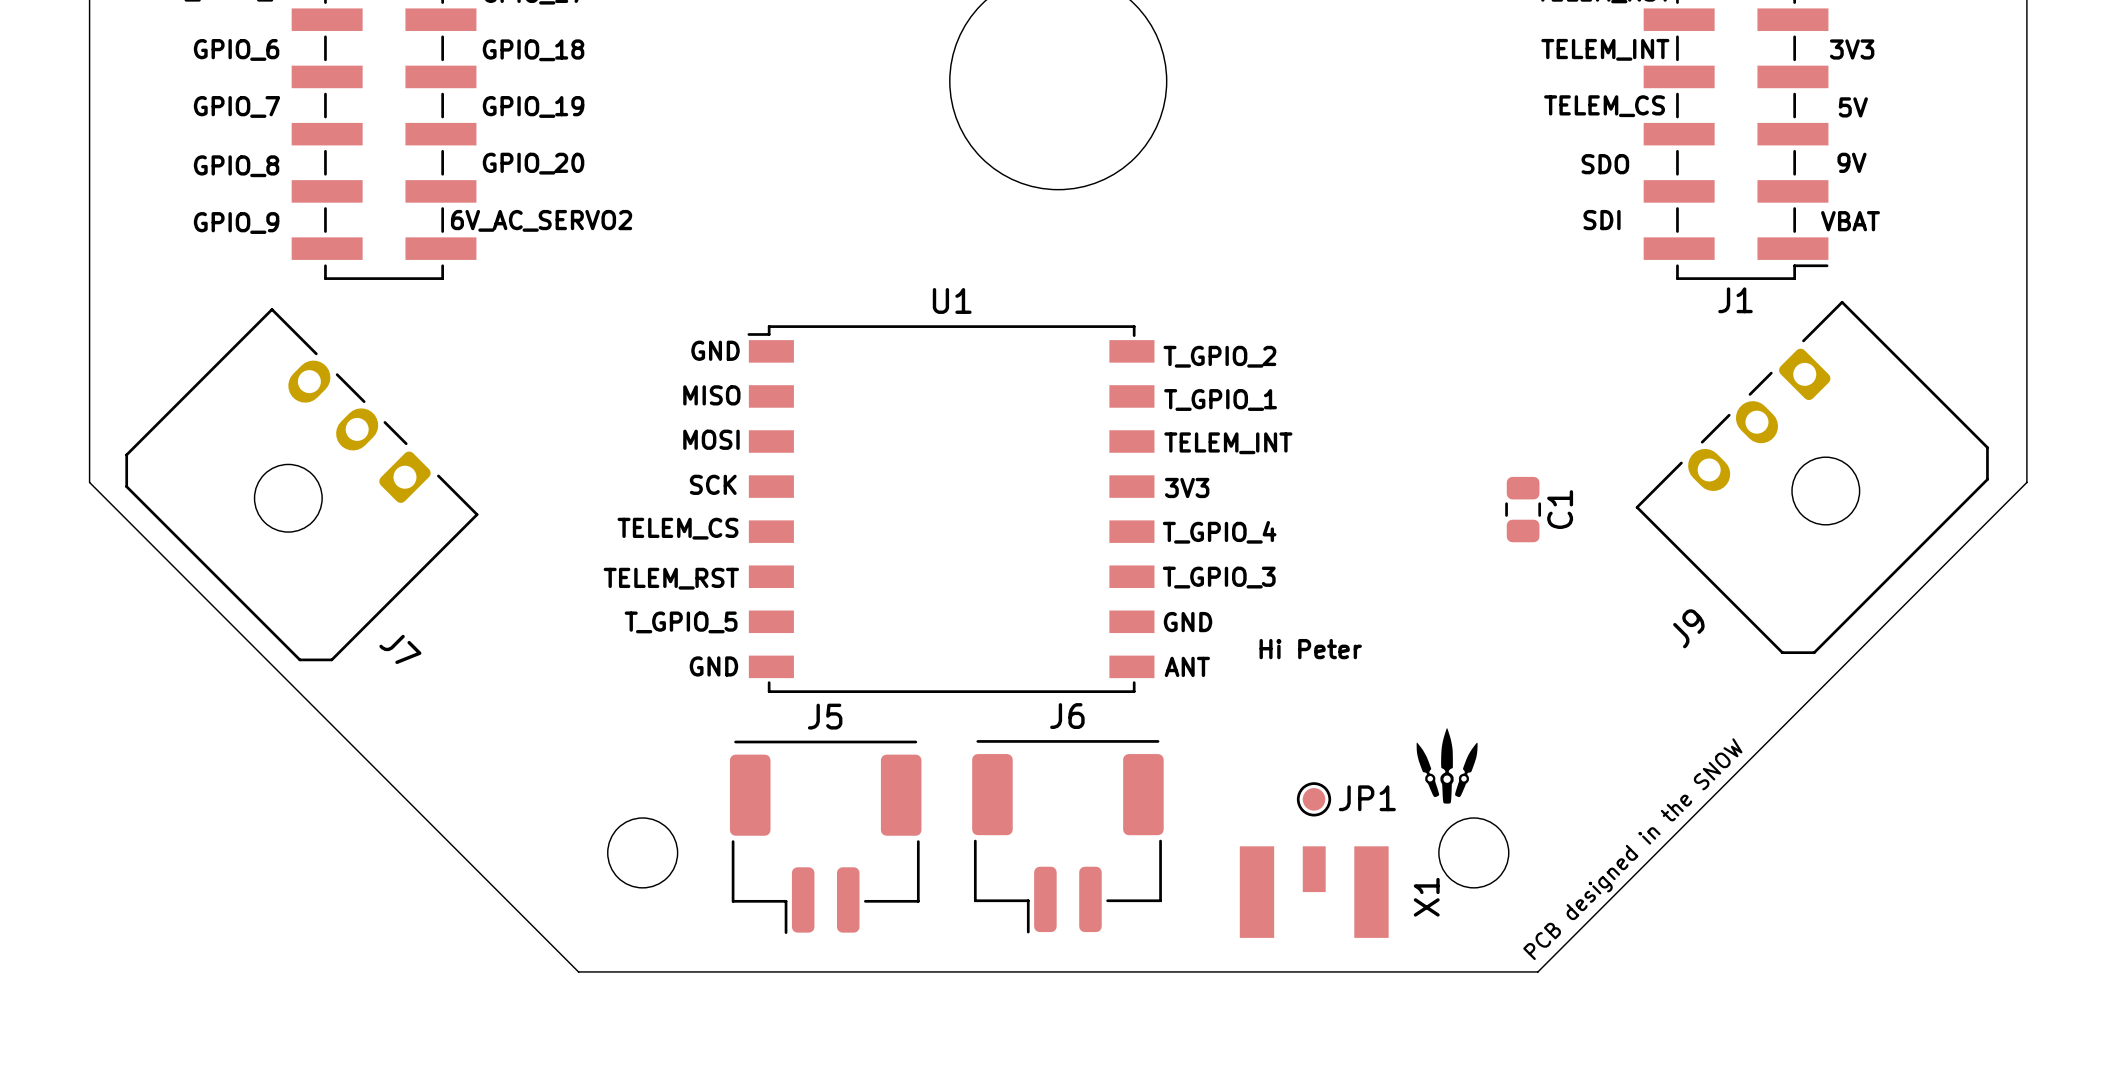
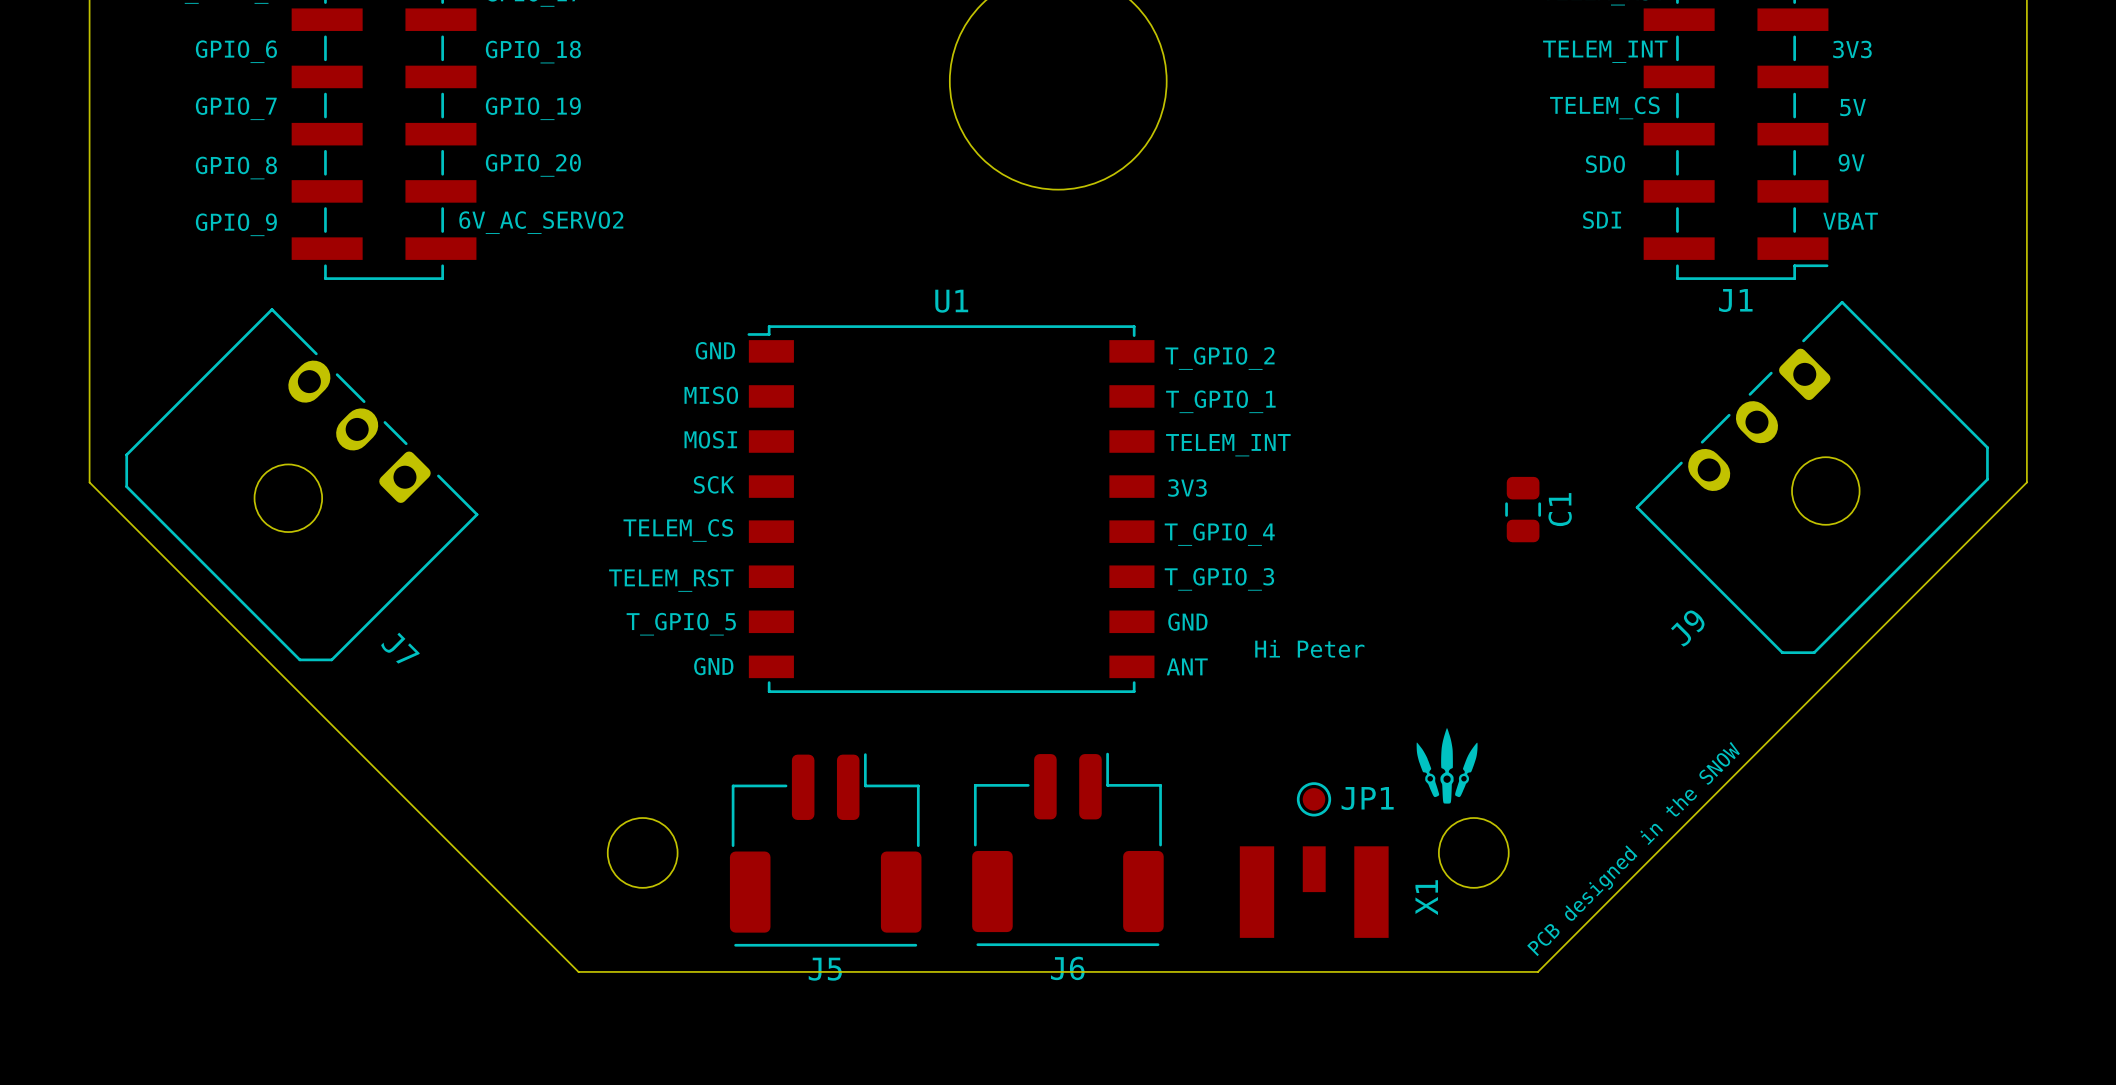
J6 rotation: 0° (1067, 836) -> 180° (1067, 849)
J5 rotation: 0° (825, 837) -> 180° (825, 849)

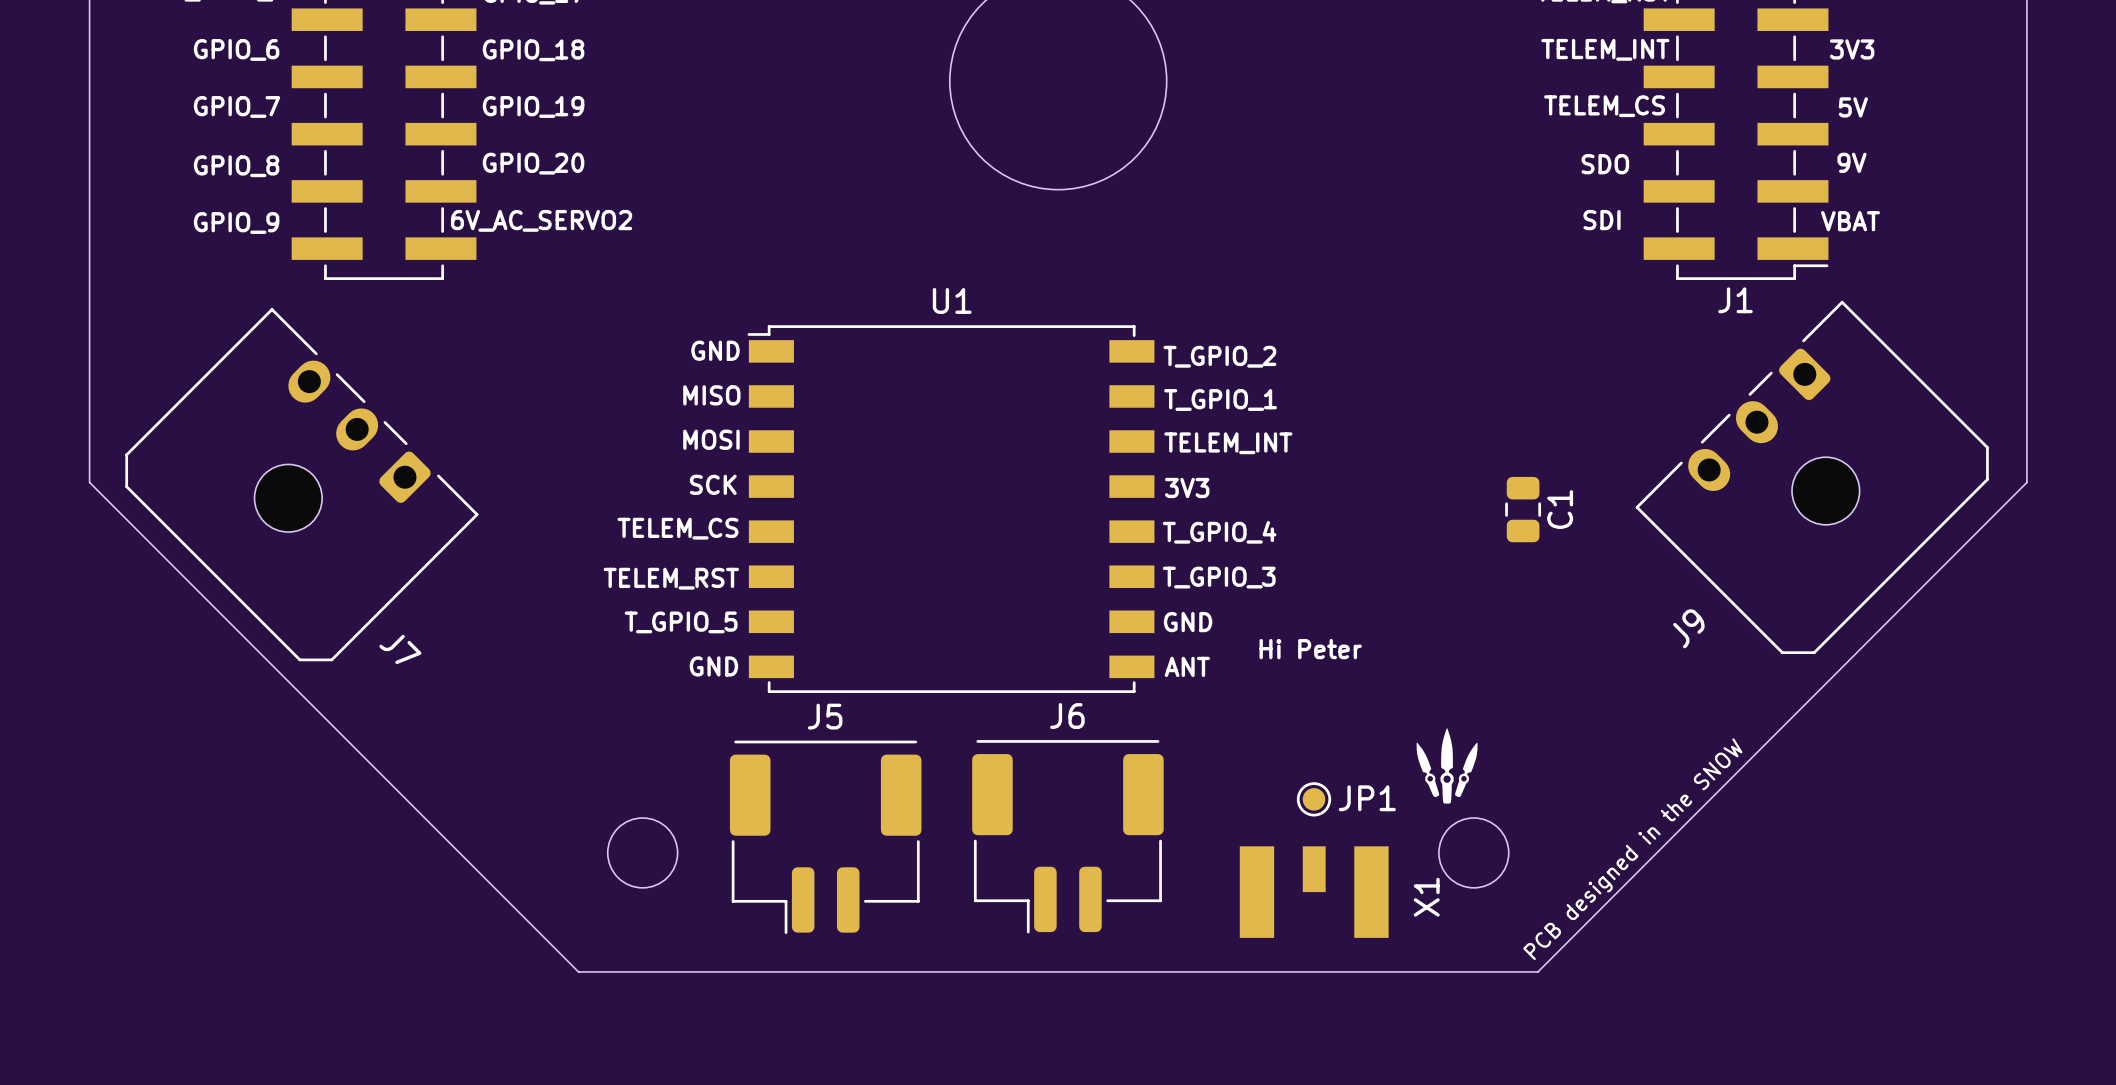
J5 rotation: 0° (825, 849) -> 180° (825, 837)
J6 rotation: 0° (1067, 849) -> 180° (1067, 836)

